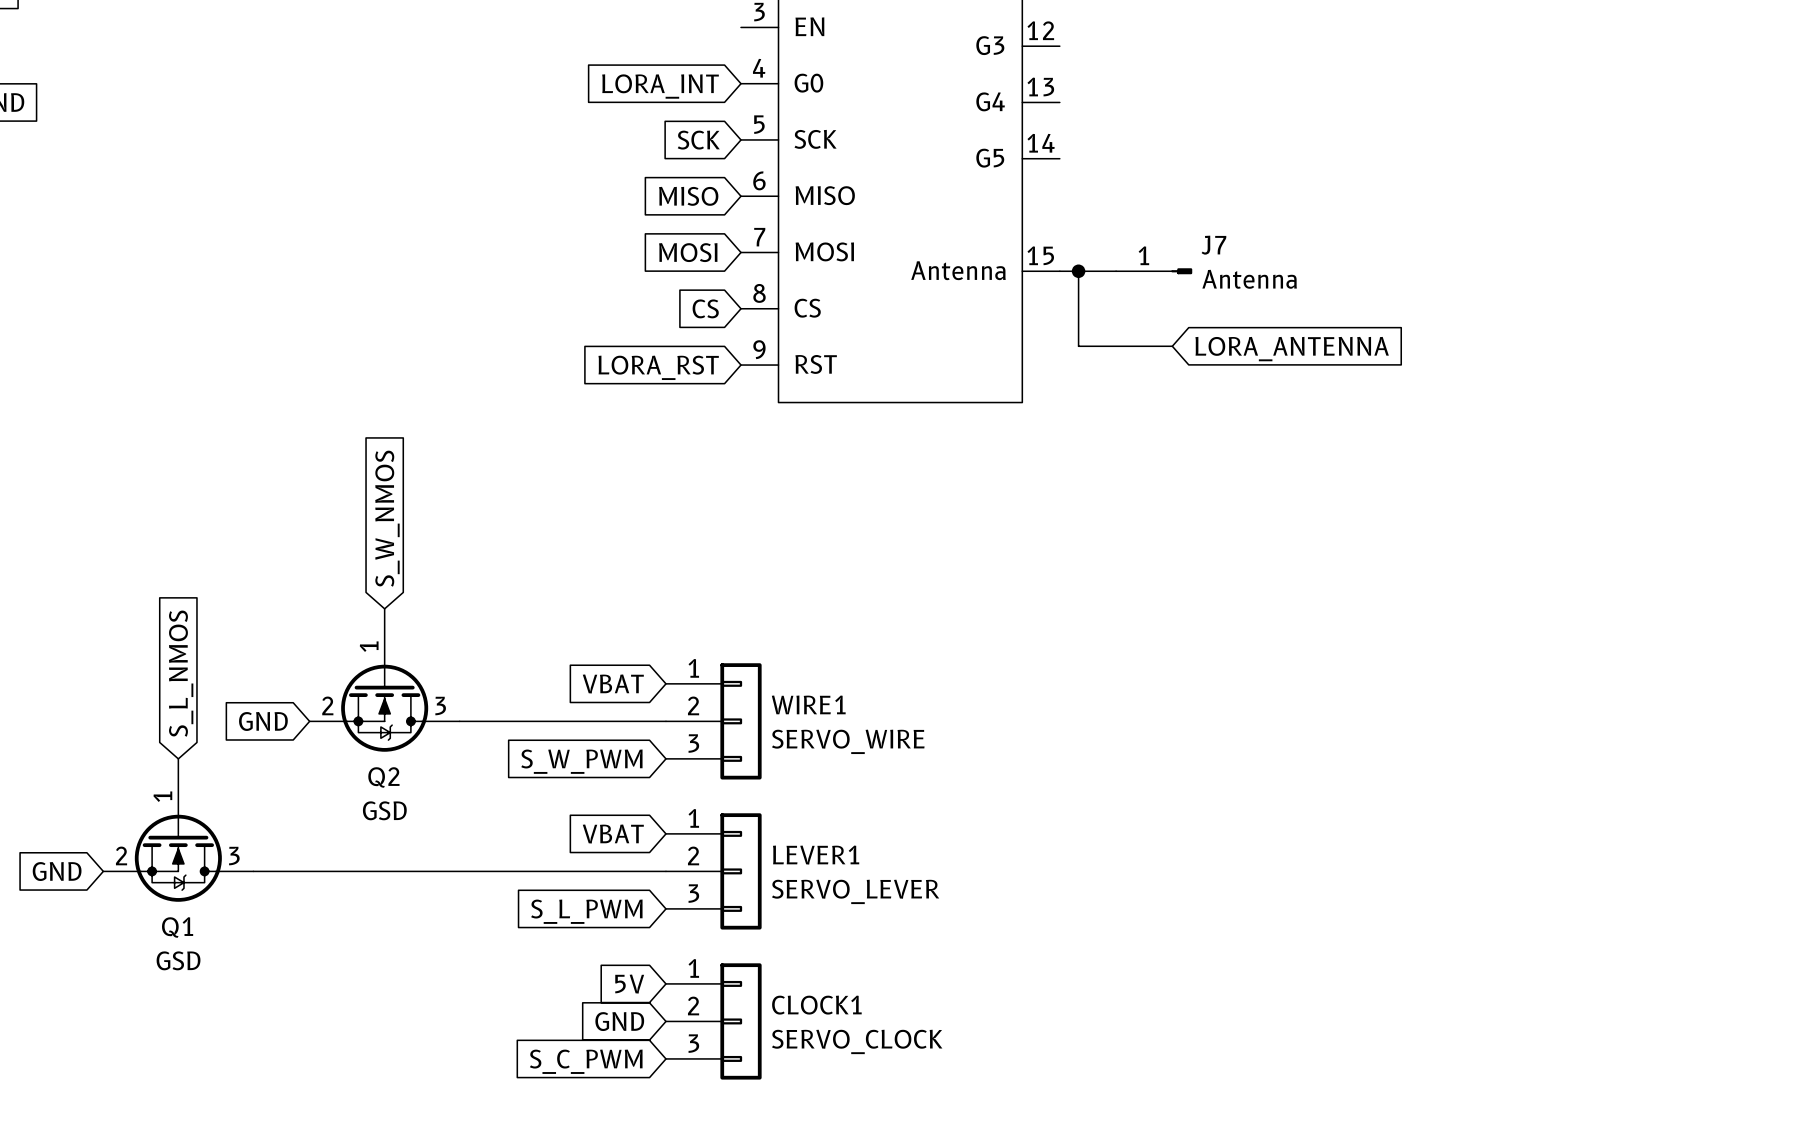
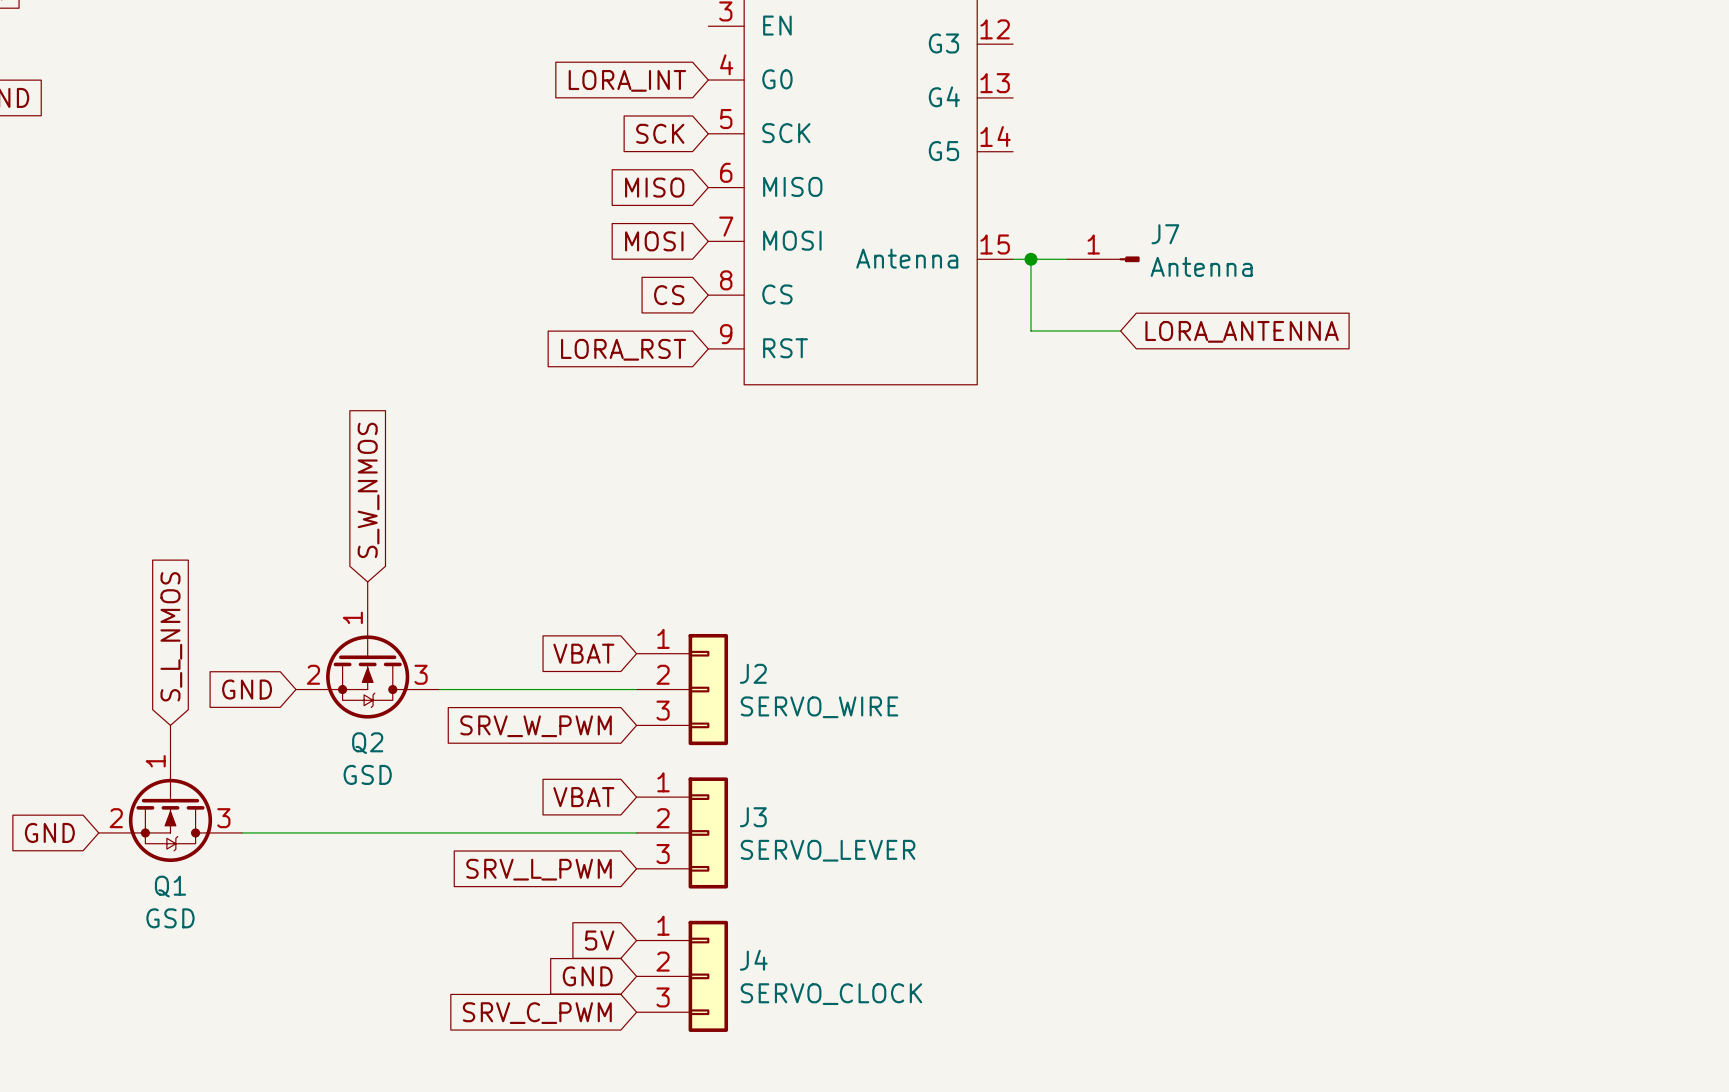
WIRE1 name: WIRE1 (808, 704) -> J2 (753, 673)
global label: S_W_PWM (581, 761) -> SRV_W_PWM (536, 726)
LEVER1 name: LEVER1 (816, 855) -> J3 (753, 817)
global label: S_L_PWM (586, 911) -> SRV_L_PWM (539, 869)
CLOCK1 name: CLOCK1 (816, 1005) -> J4 (753, 960)
global label: S_C_PWM (586, 1061) -> SRV_C_PWM (537, 1013)

